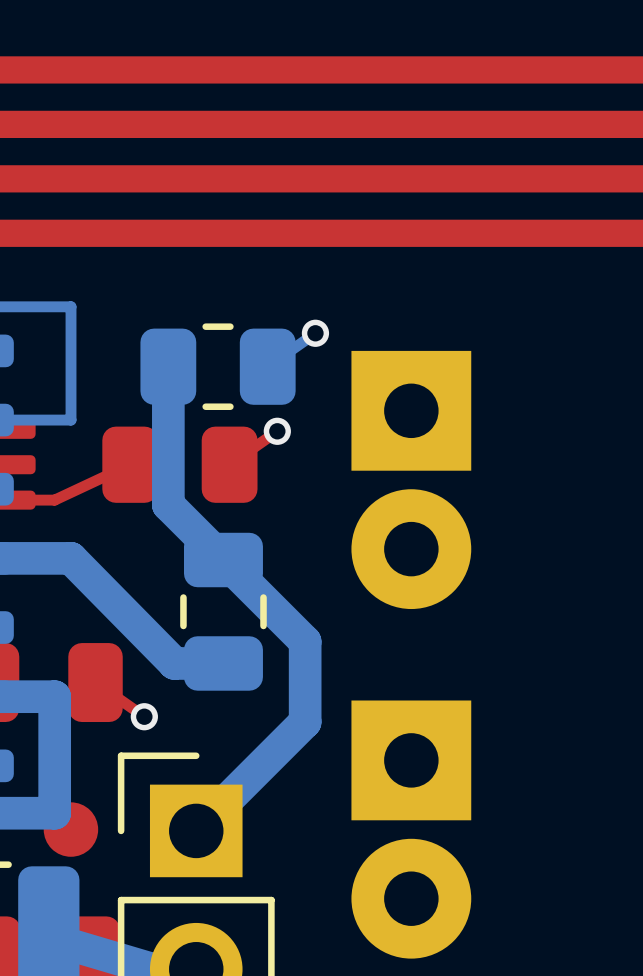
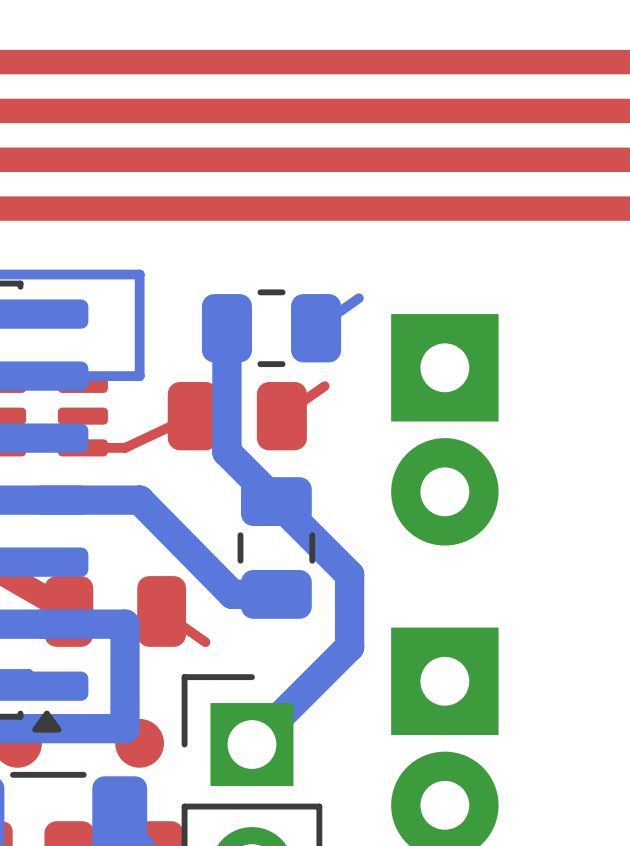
via: (315, 333) -> none
via: (277, 431) -> none
via: (144, 716) -> none

